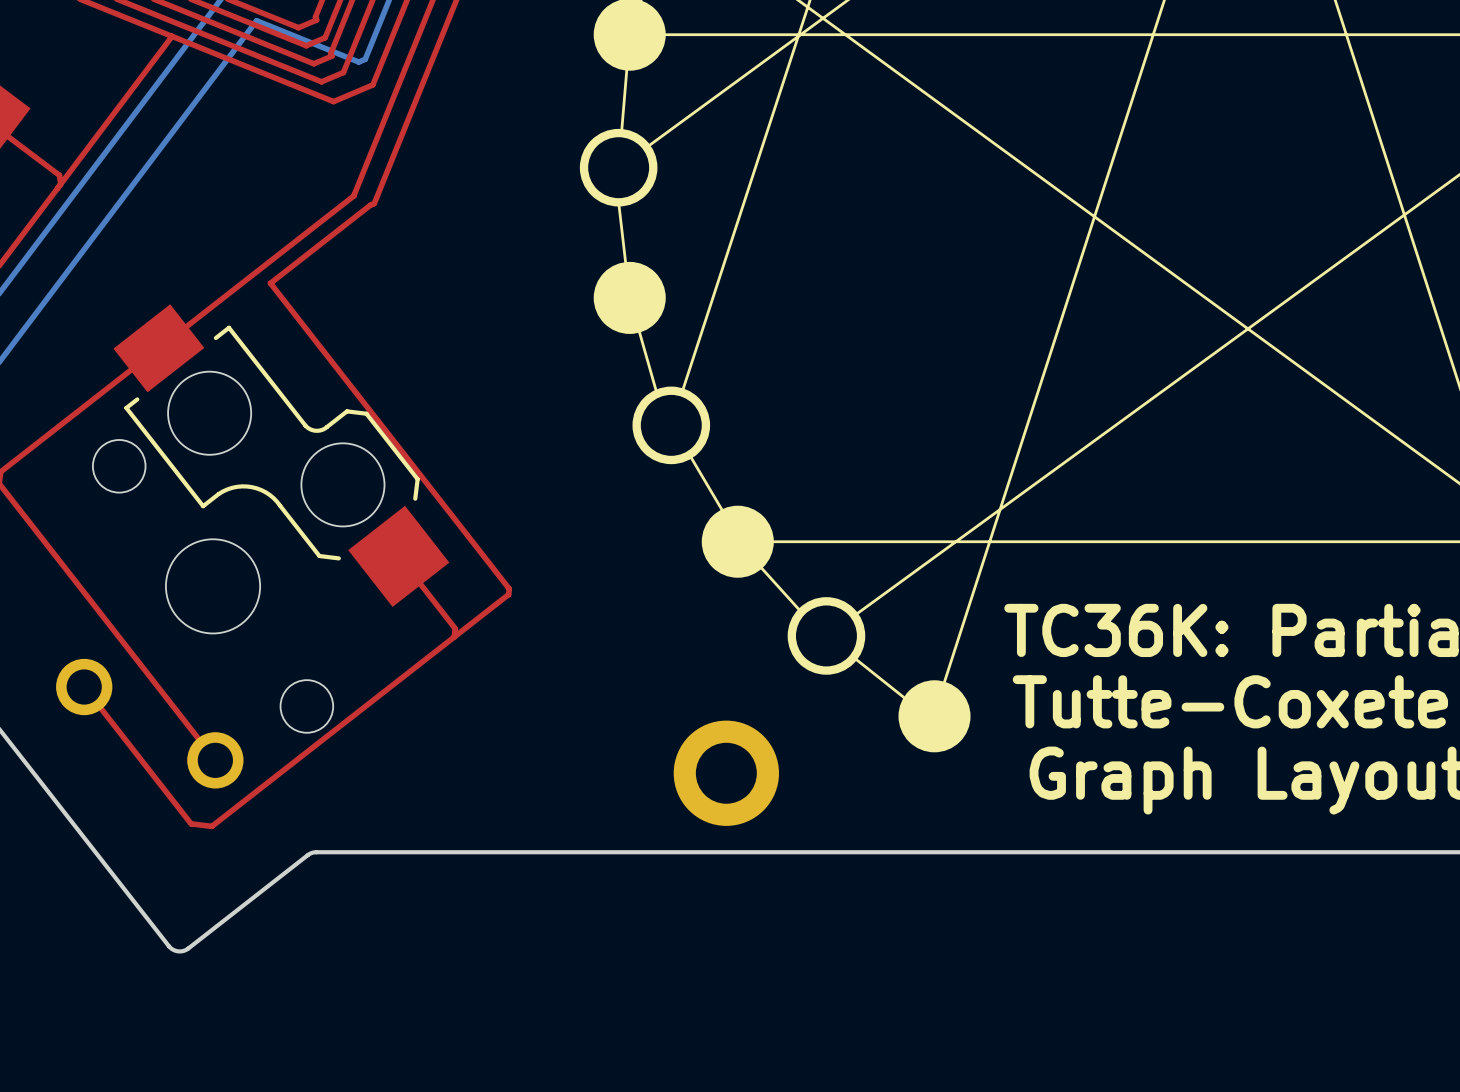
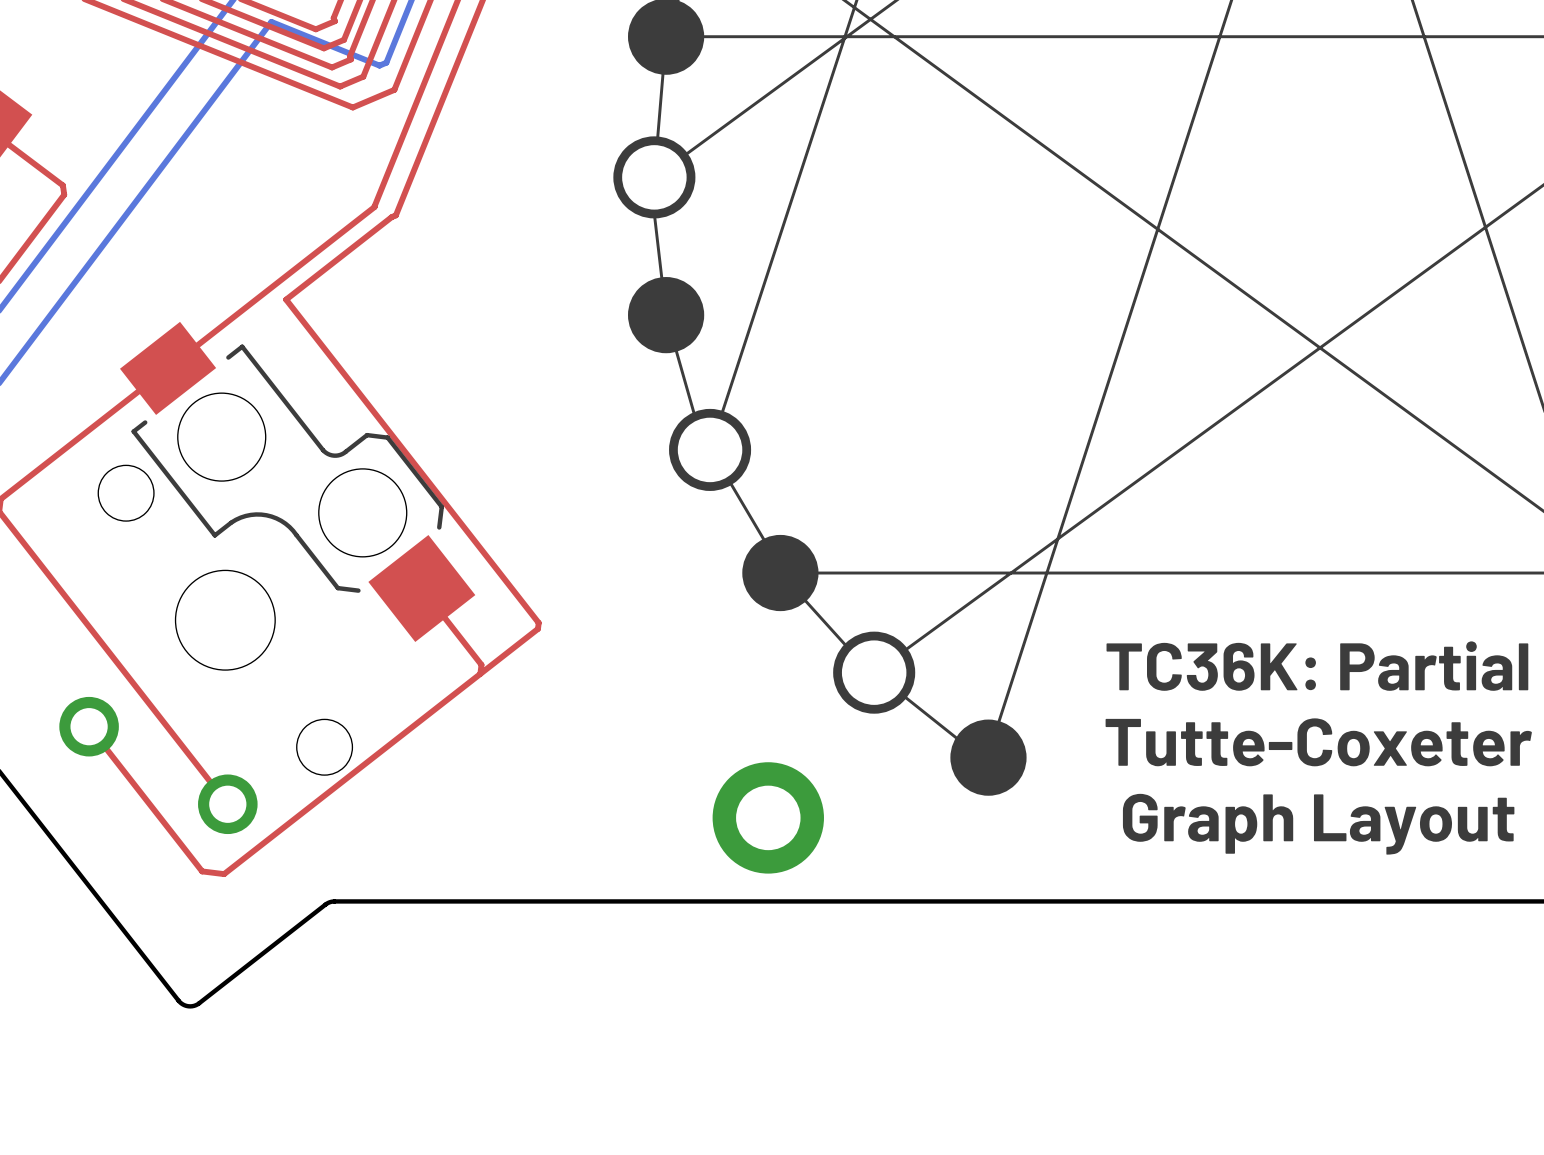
top track: (171, 36) (60, 184) -> none

